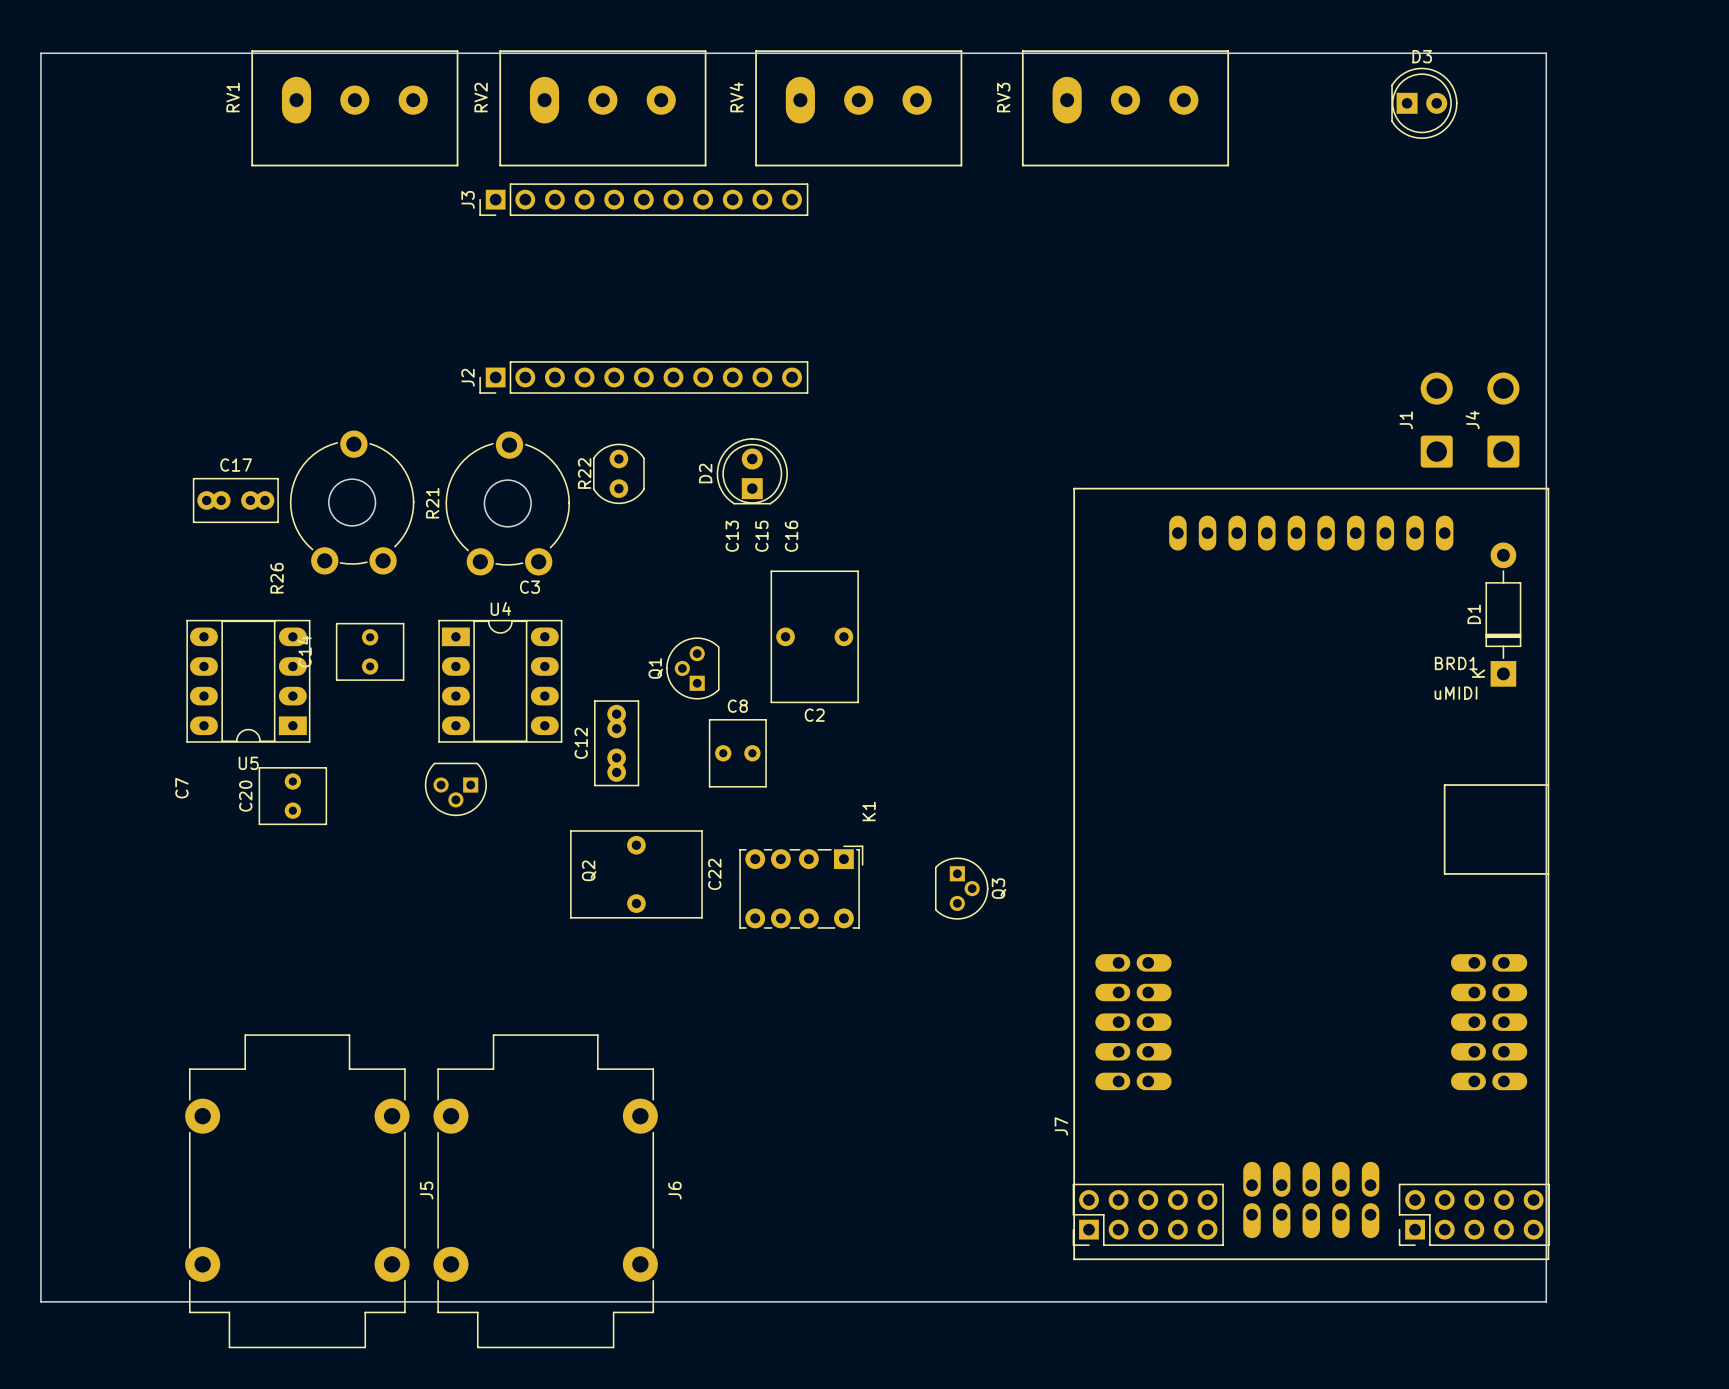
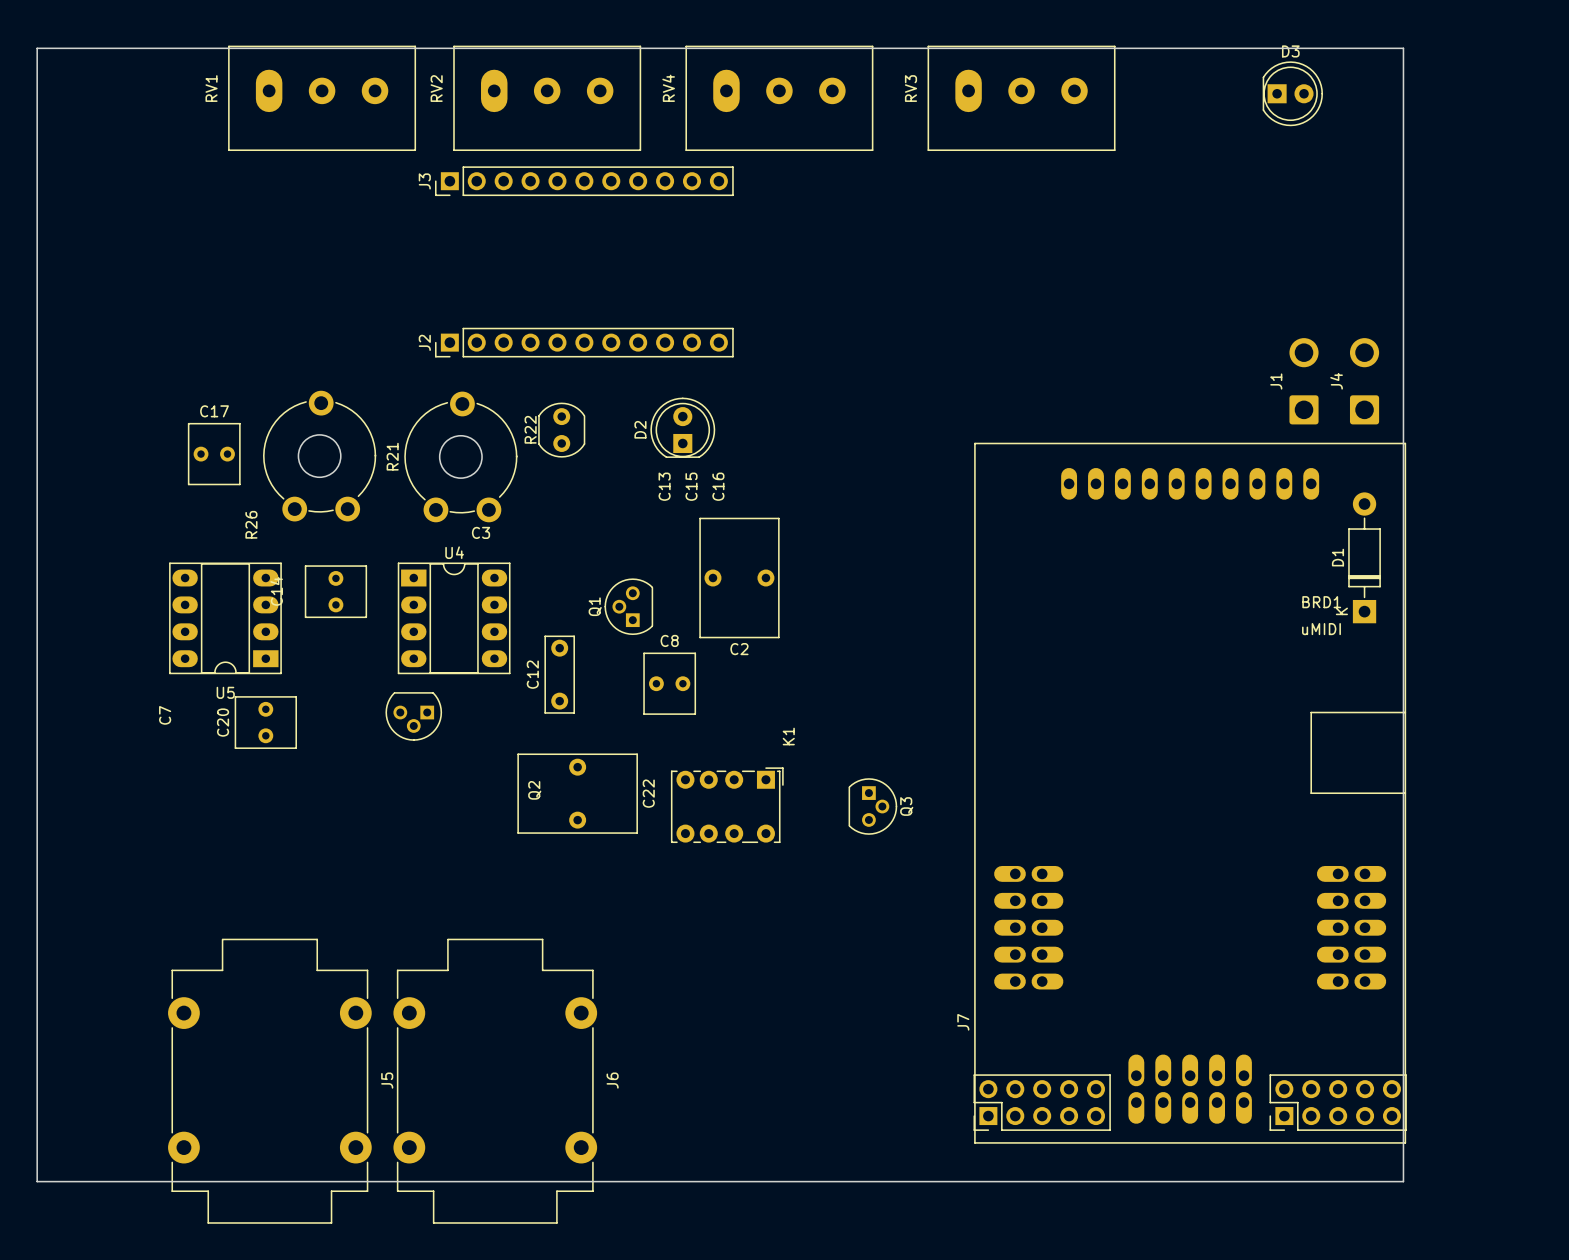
C17 footprint: [192, 477, 279, 524] -> [187, 423, 241, 486]
C12 footprint: [594, 700, 640, 787] -> [544, 635, 575, 714]

